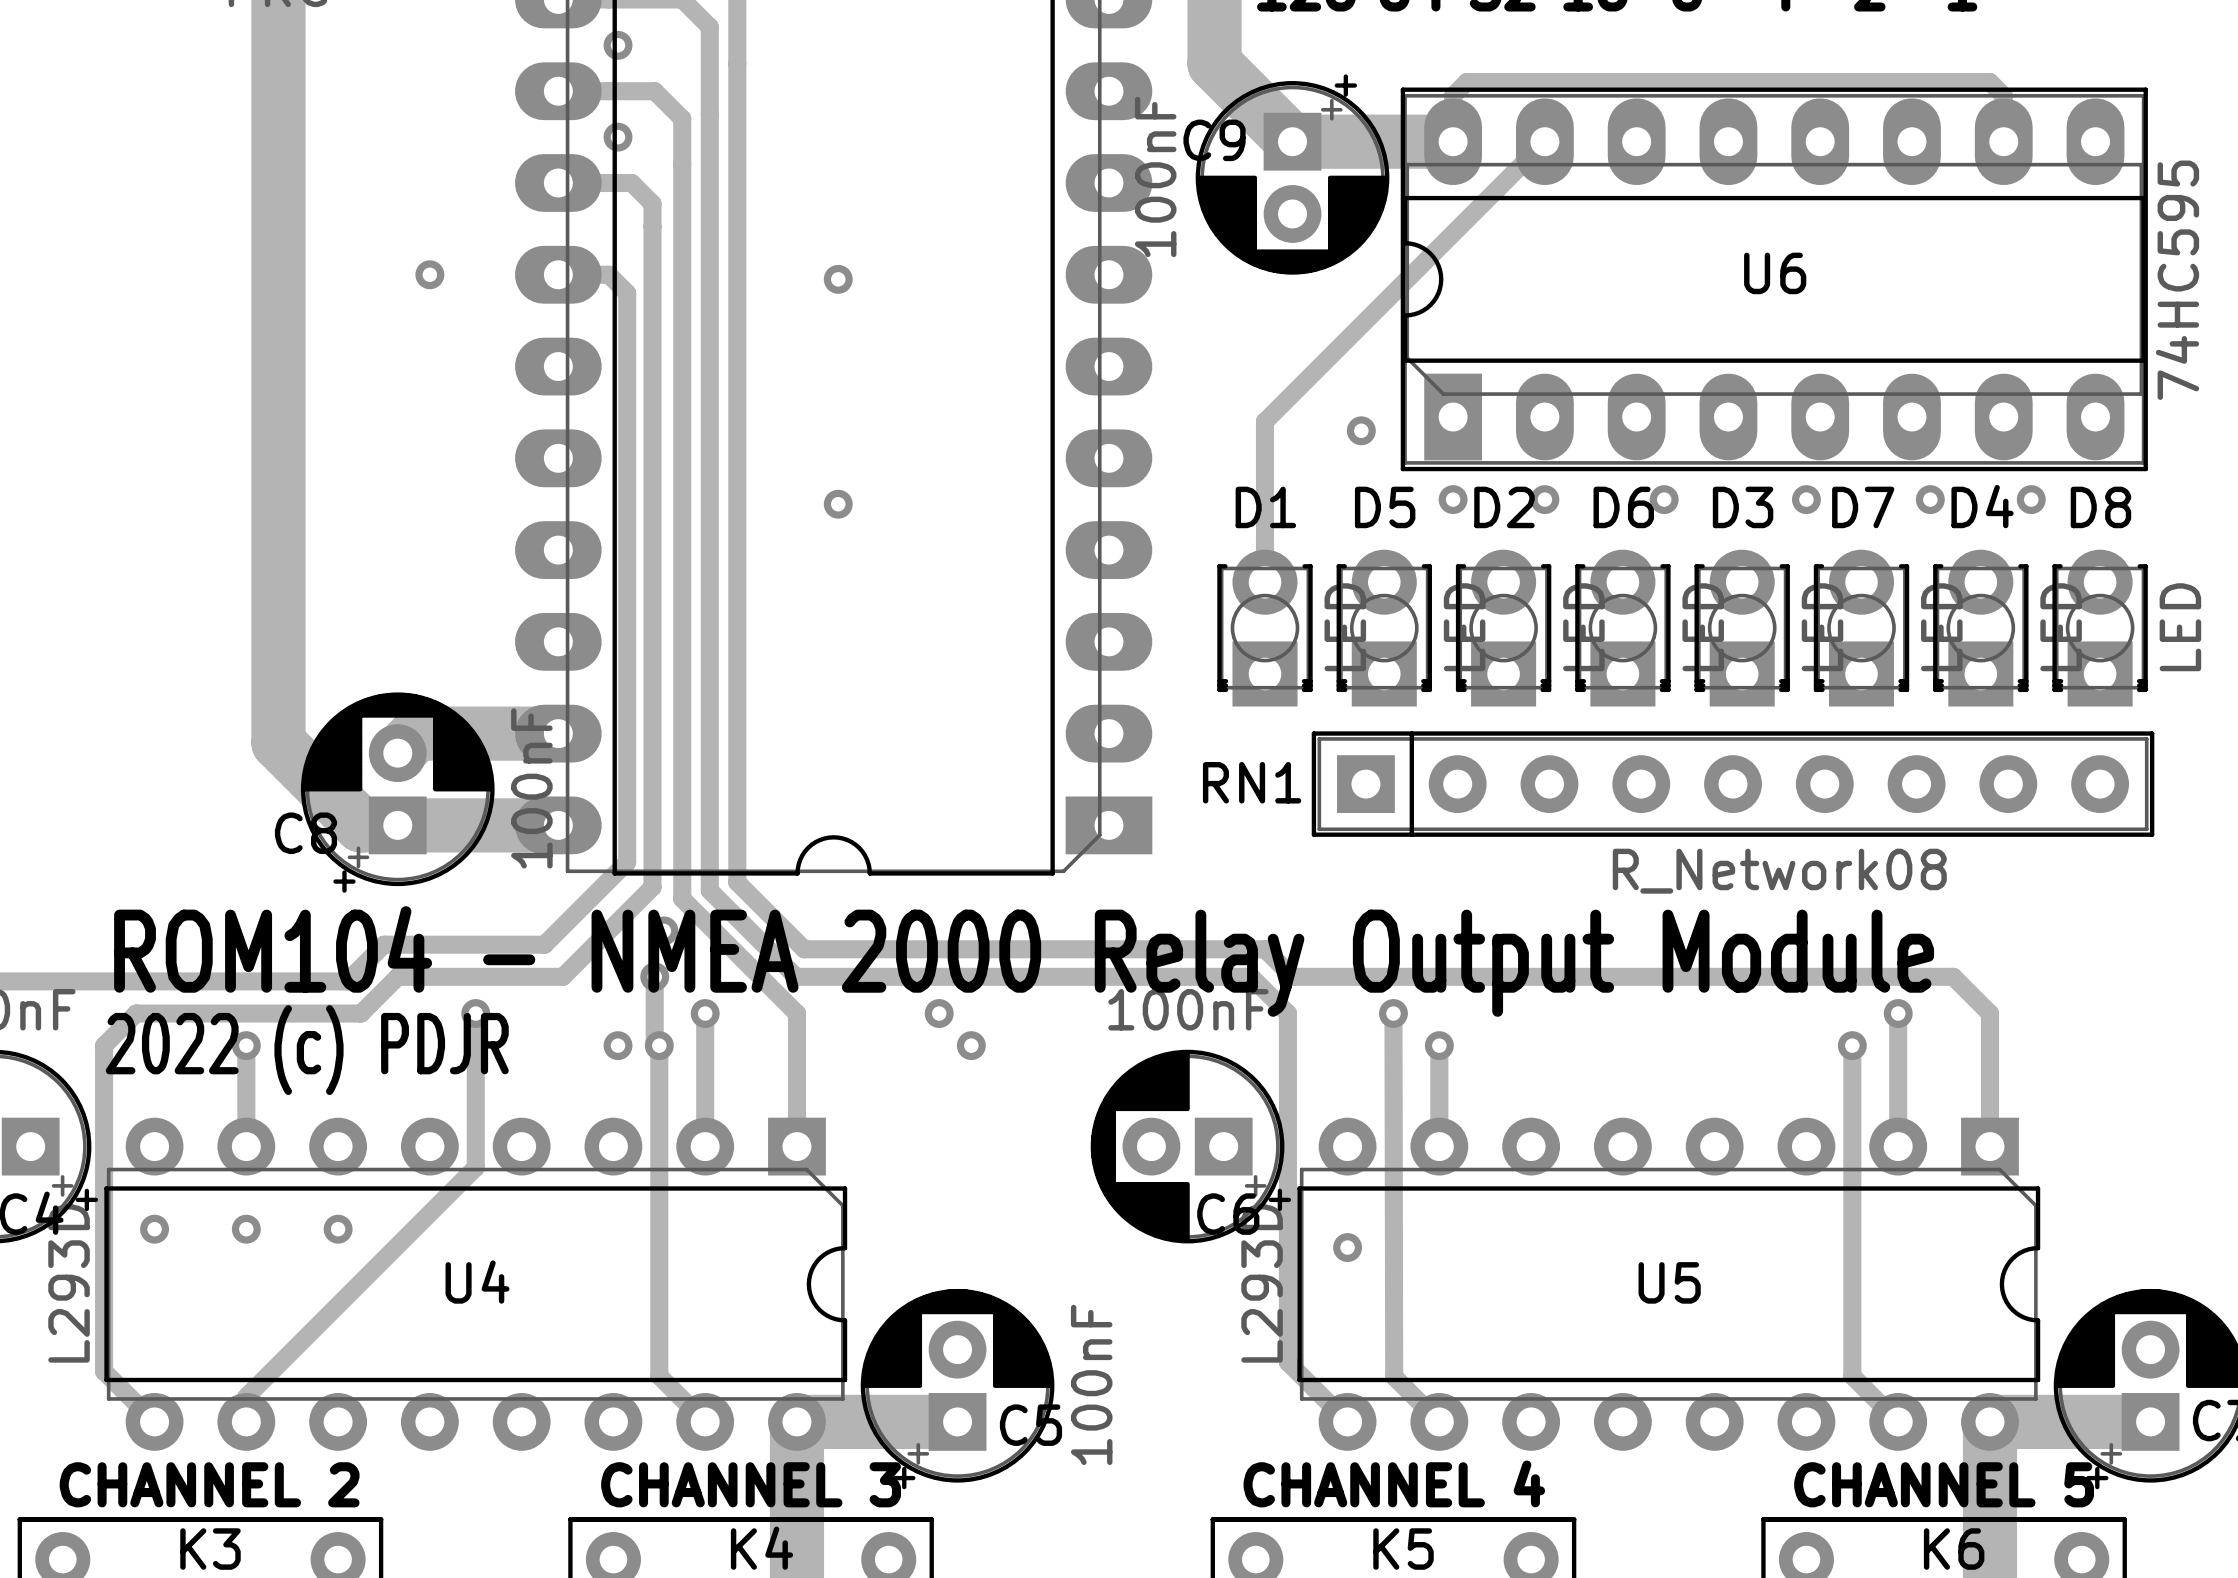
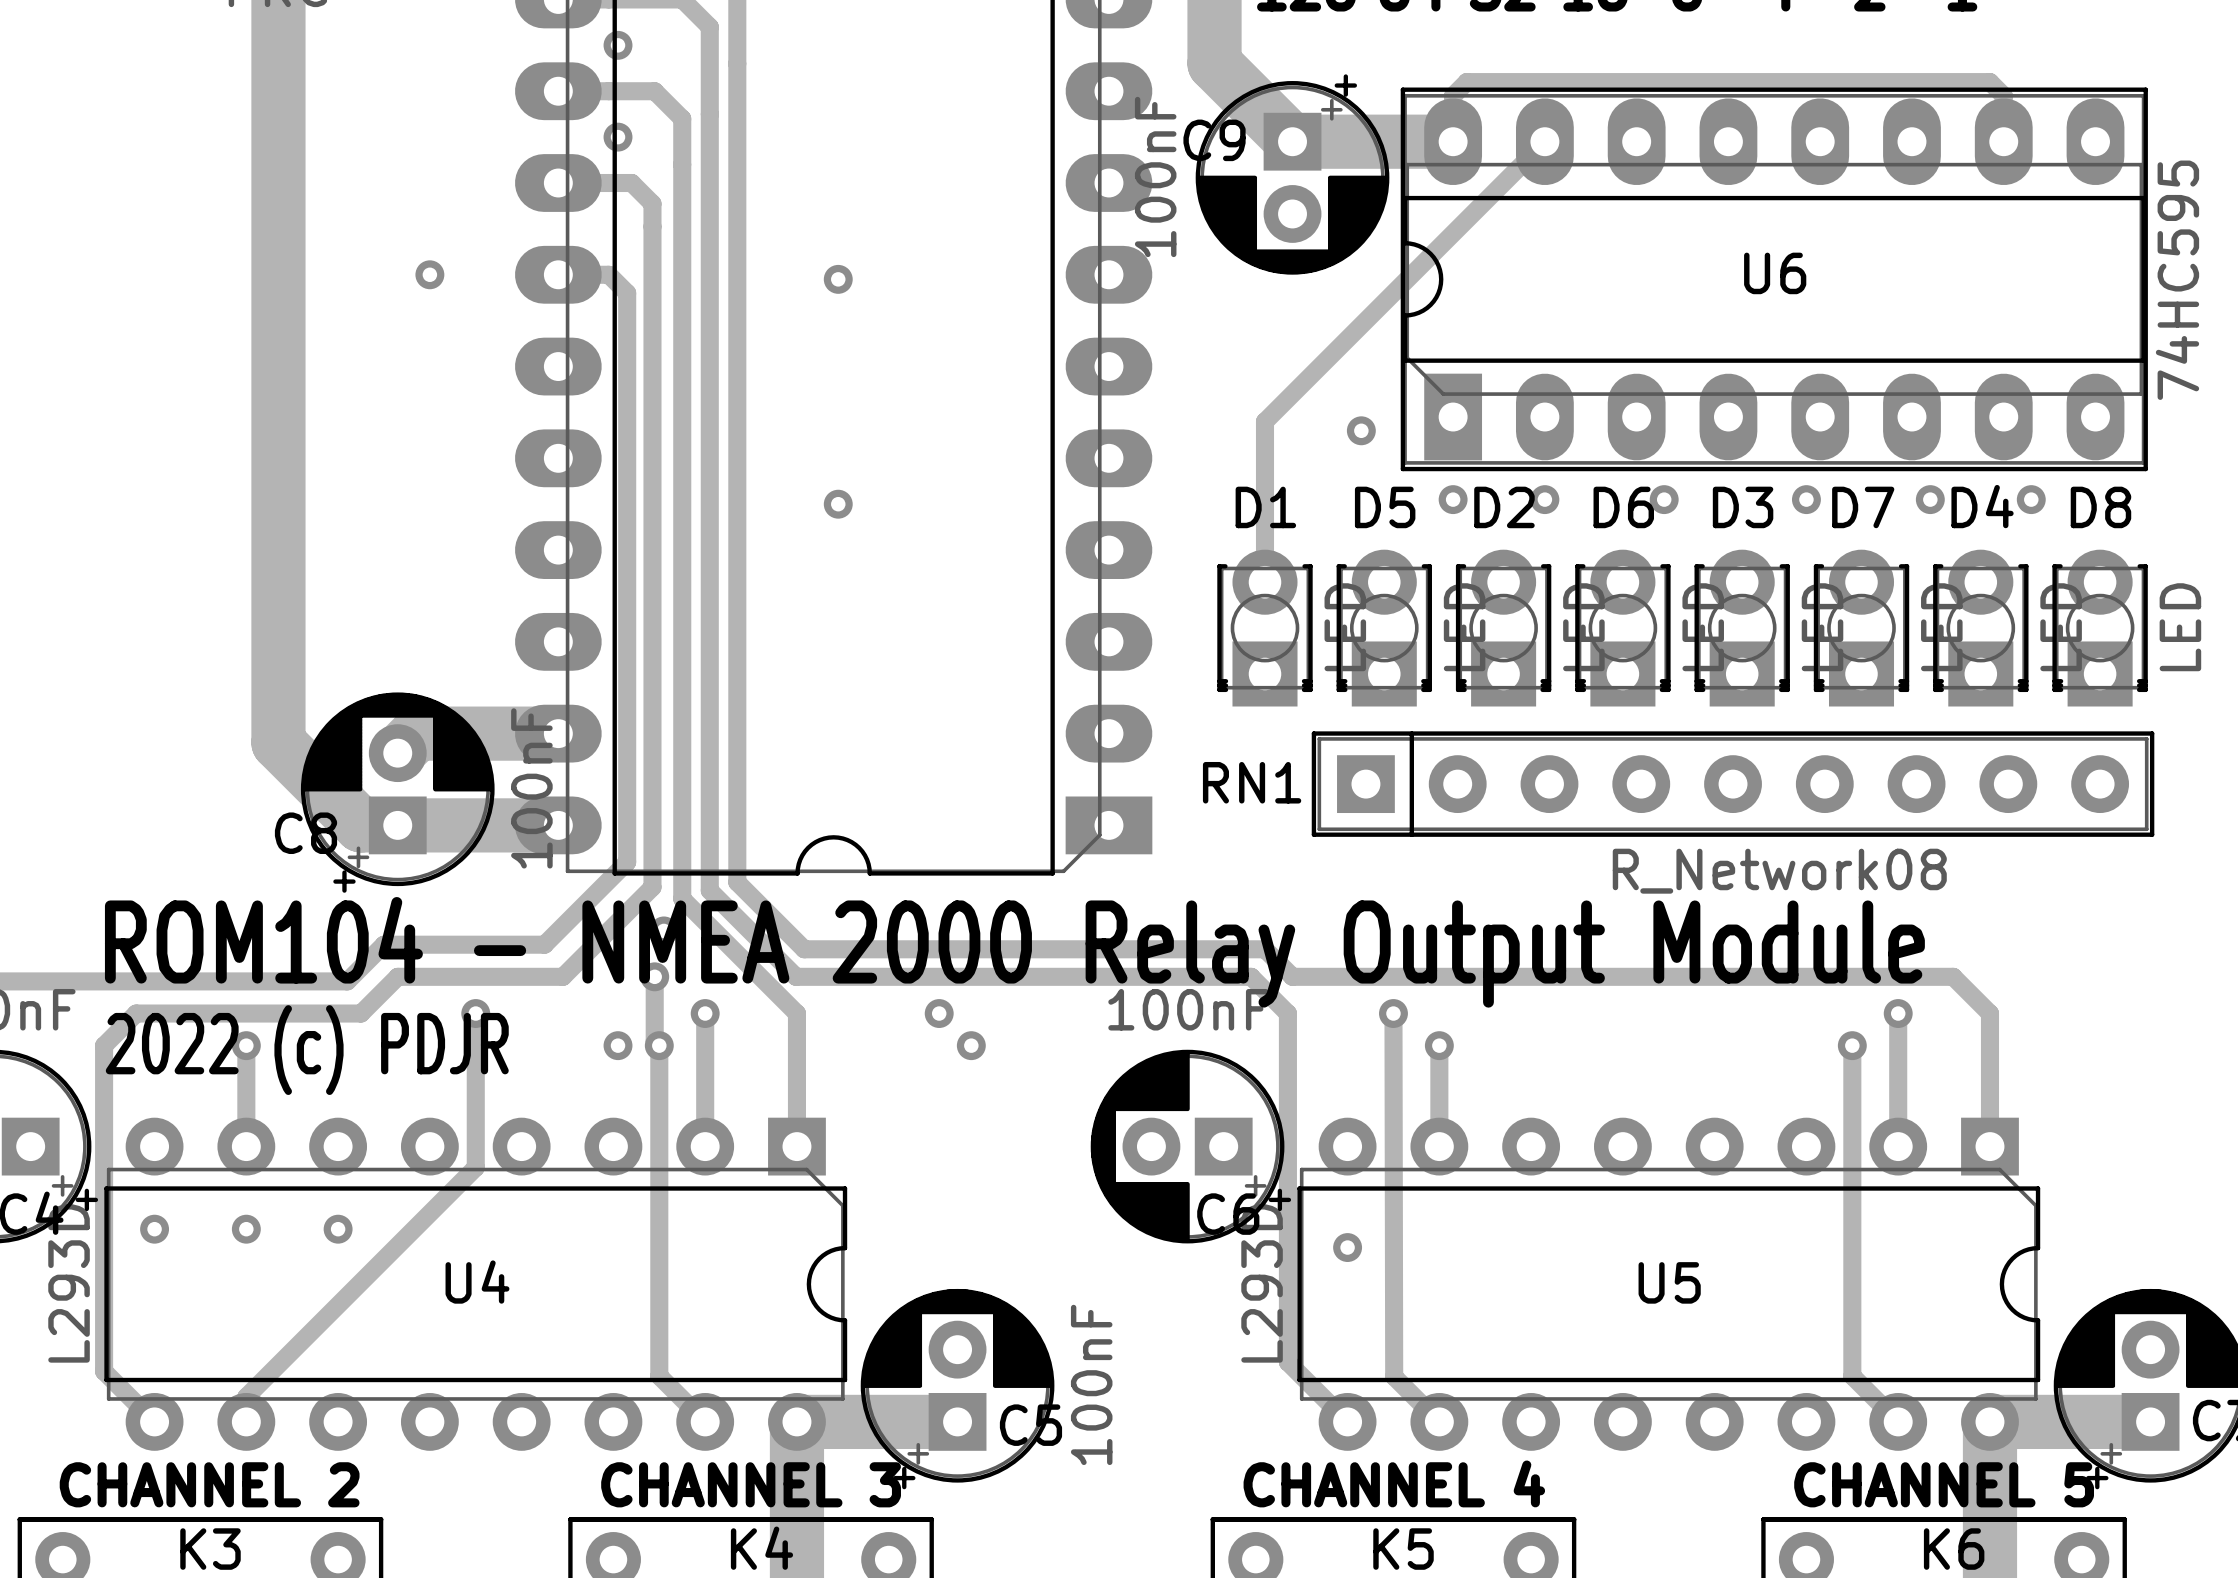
text position: ROM104 - NMEA 2000 Relay Output Module (1024, 961) -> ROM104 - NMEA 2000 Relay Output Module (1014, 952)

